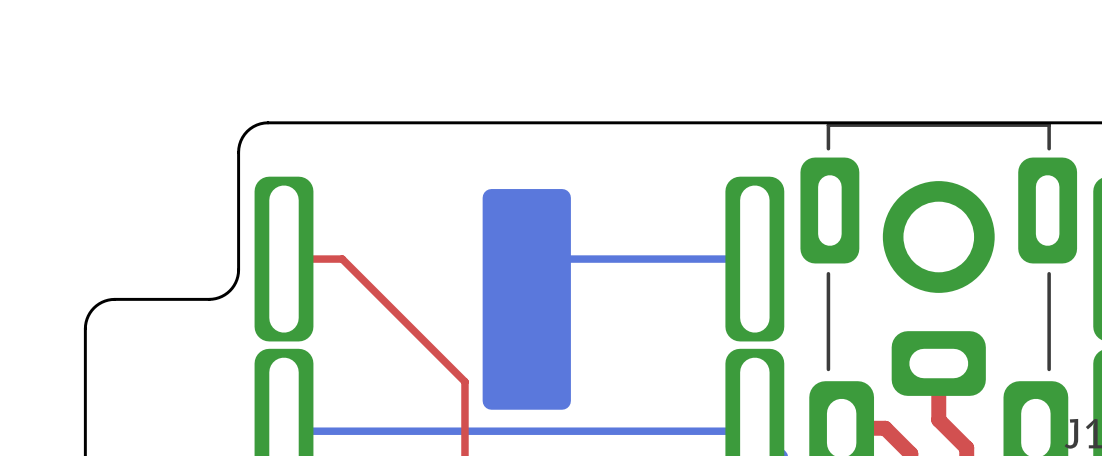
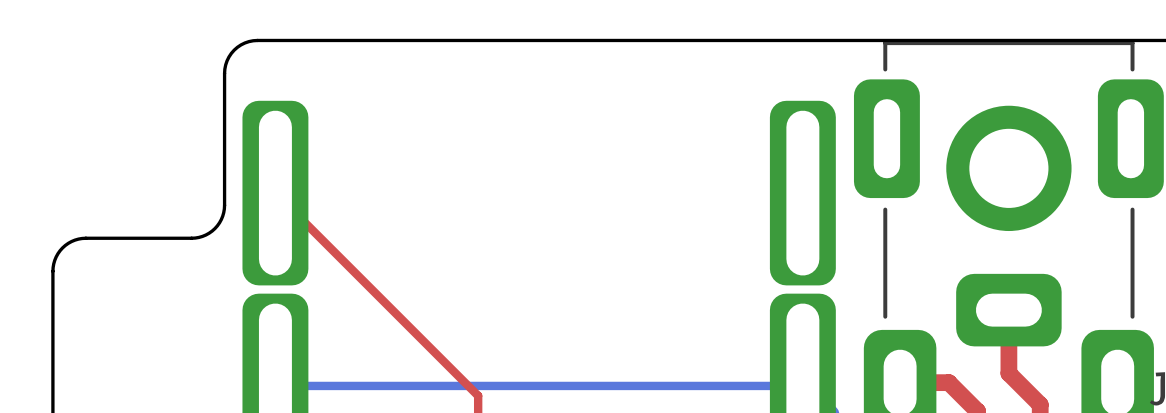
top track: (284, 259) (342, 259) (464, 381) (464, 440) -> (275, 193) (478, 395)
bottom track: (754, 259) (567, 259) (526, 299) -> none
part: (526, 299) -> none

